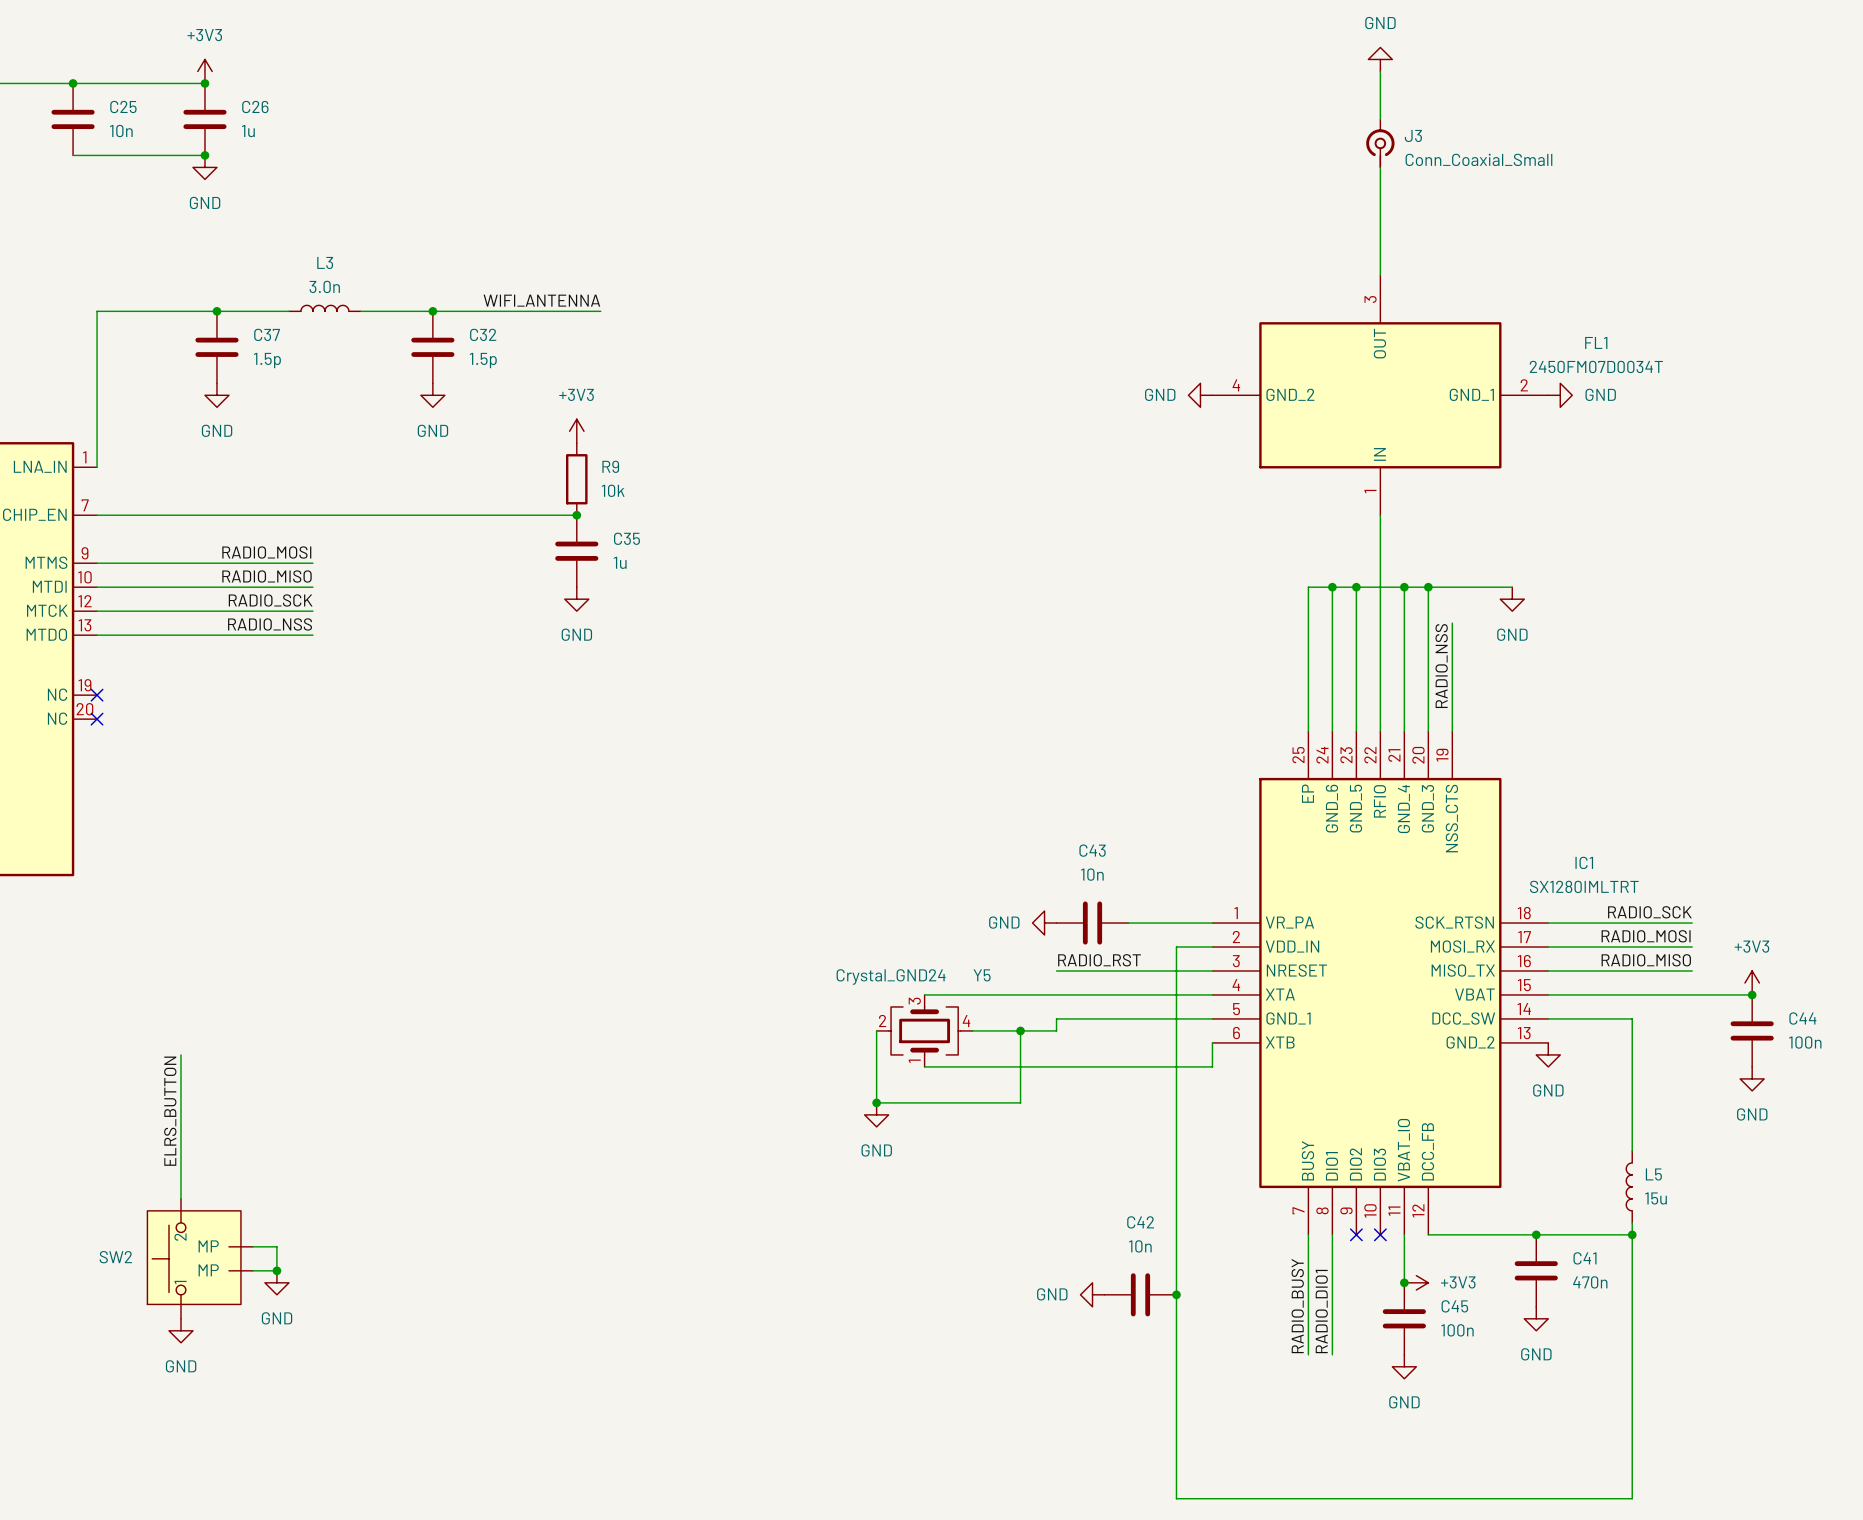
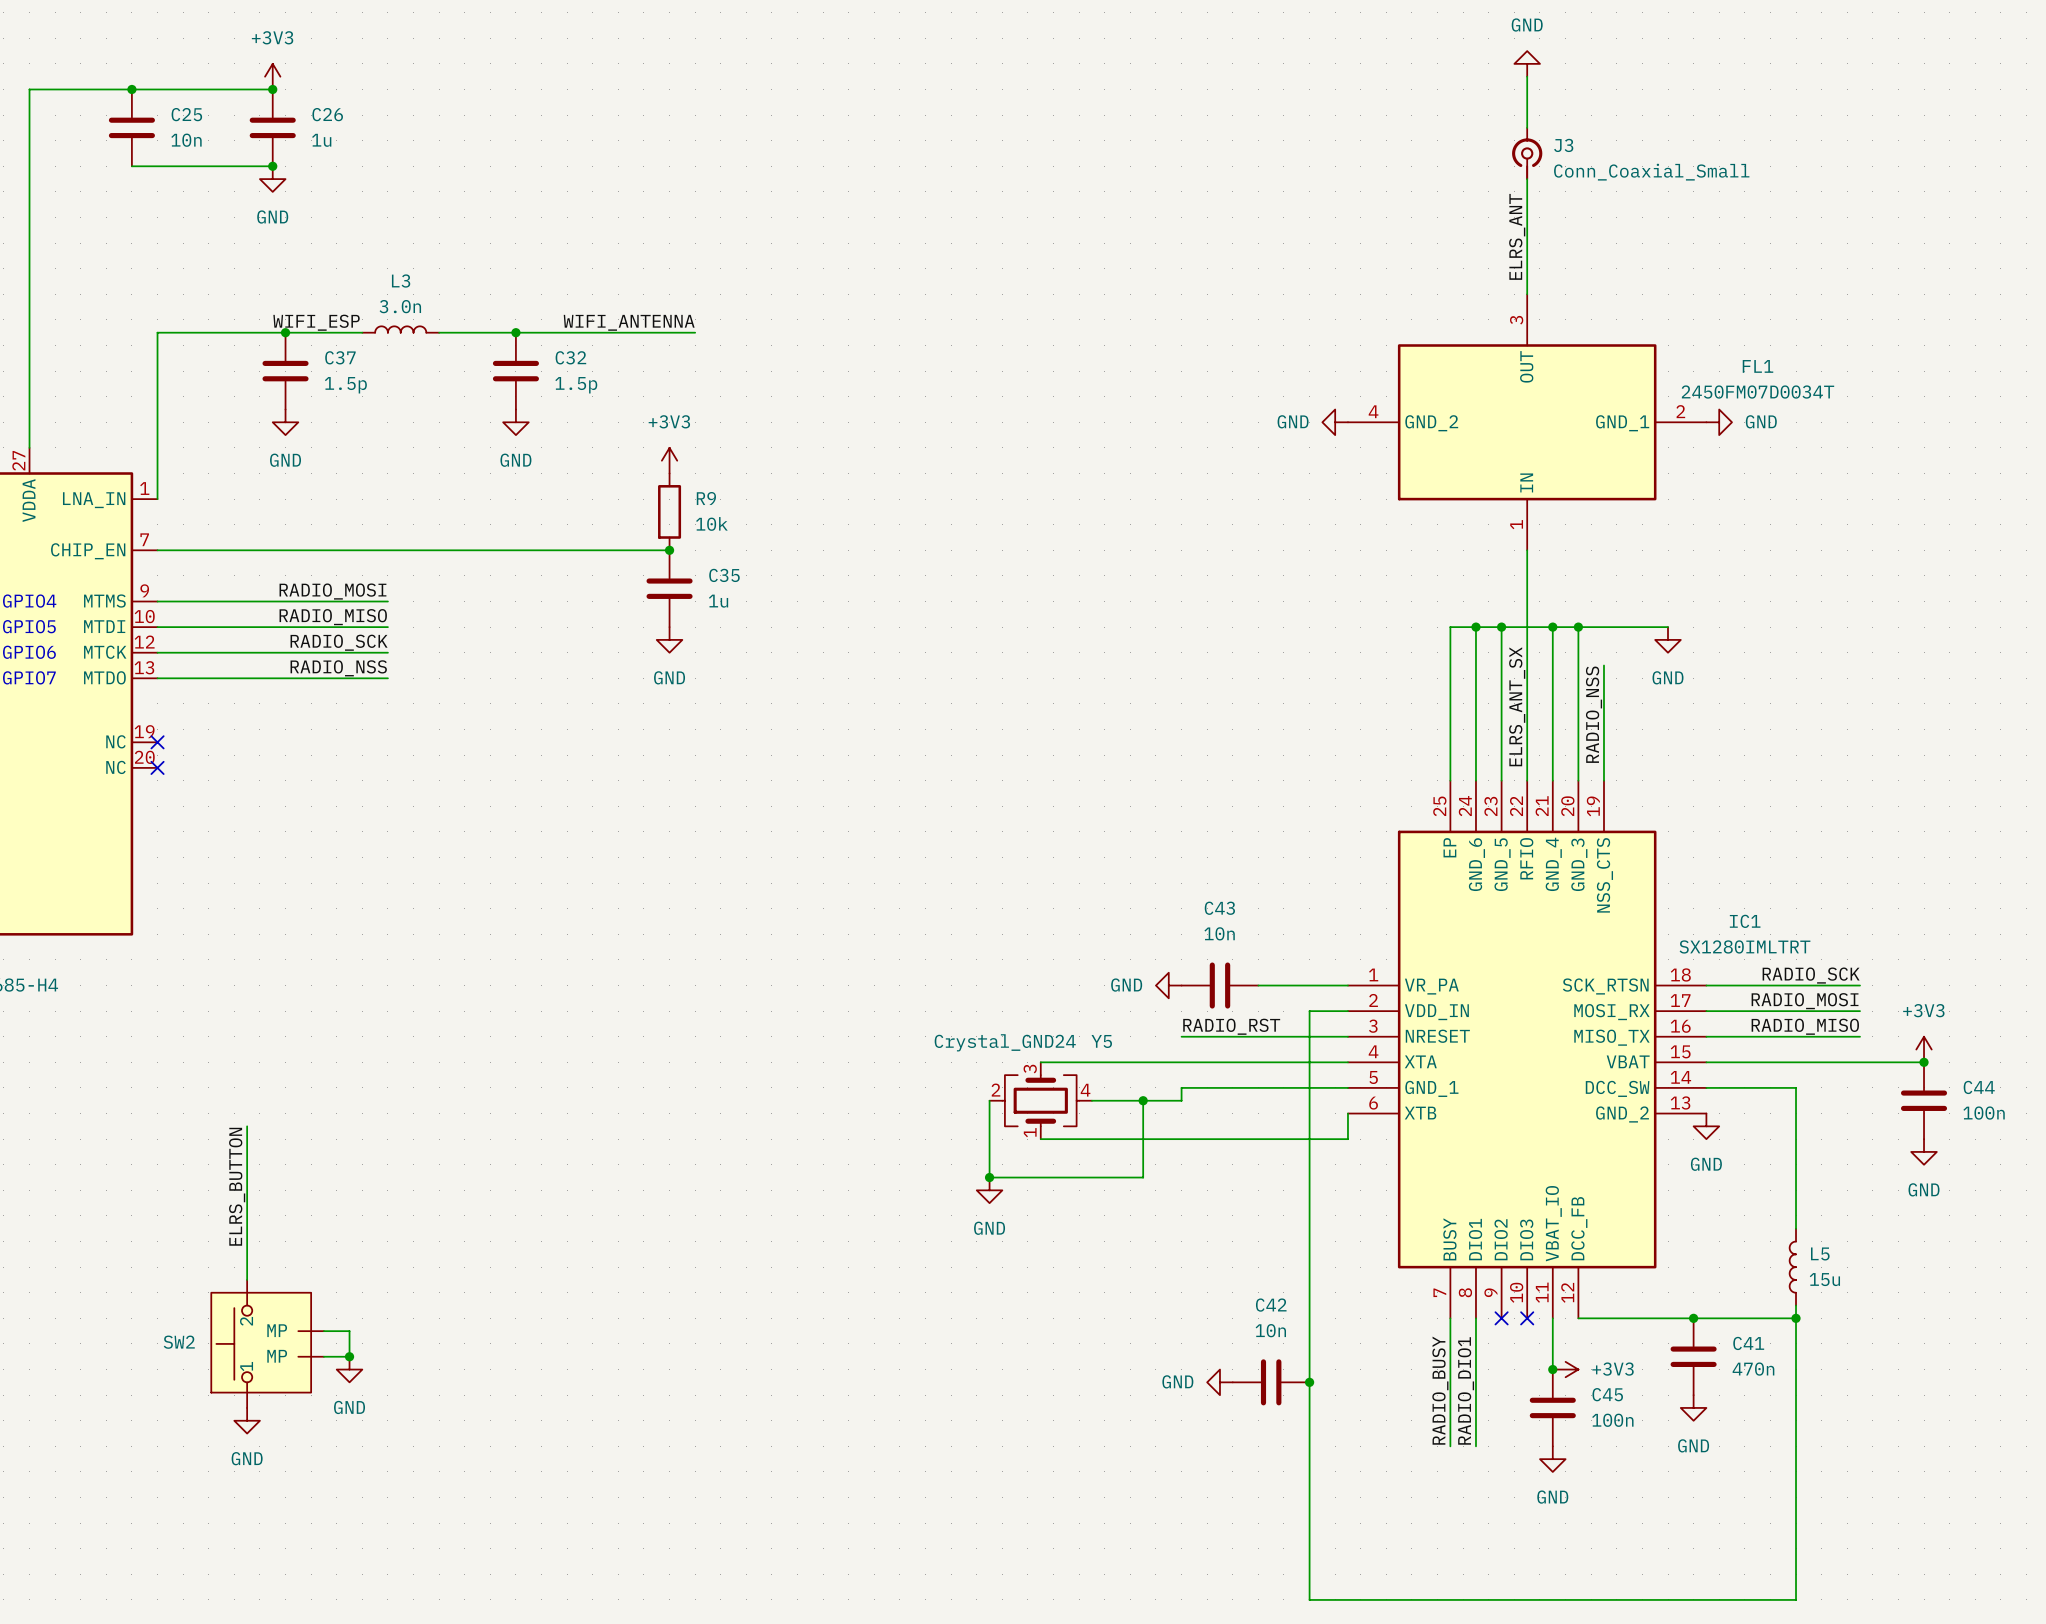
label: none -> ELRS_ANT (1517, 236)
label: none -> WIFI_ESP (316, 322)
label: none -> ELRS_ANT_SX (1517, 706)

